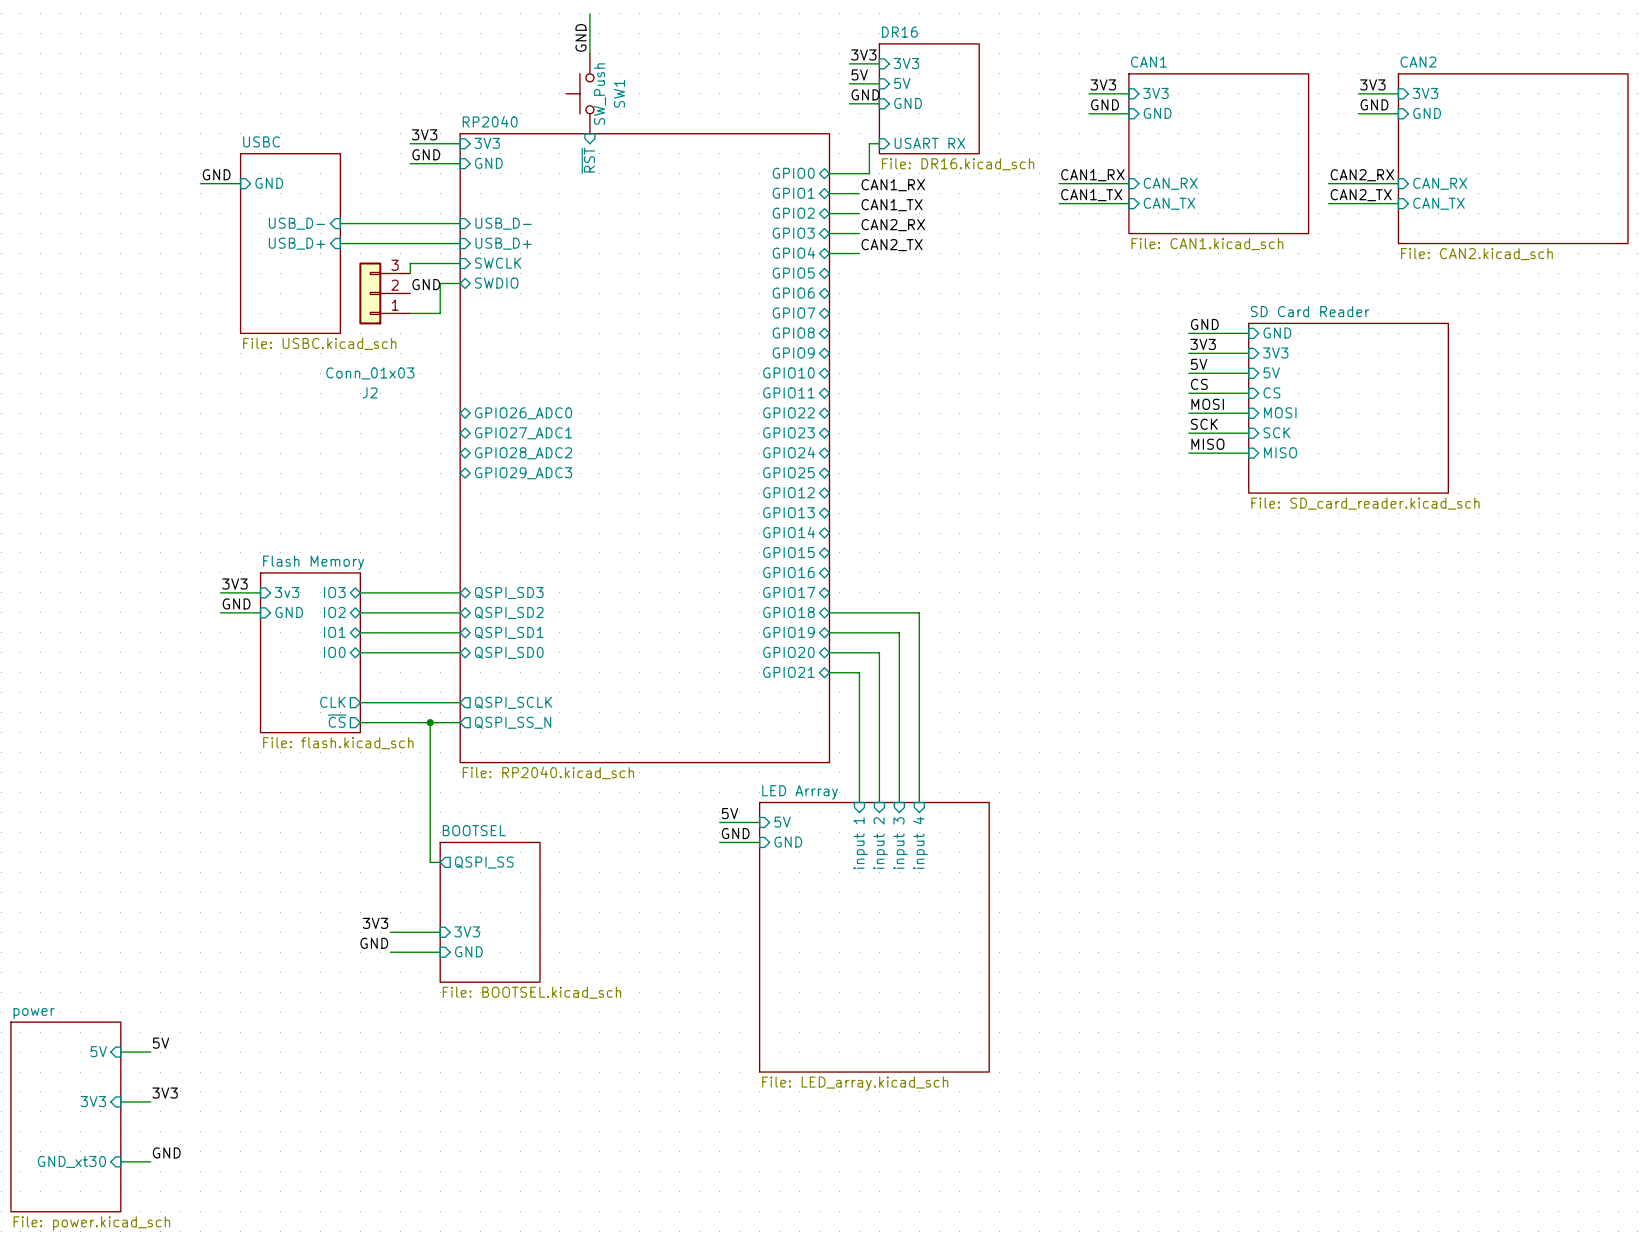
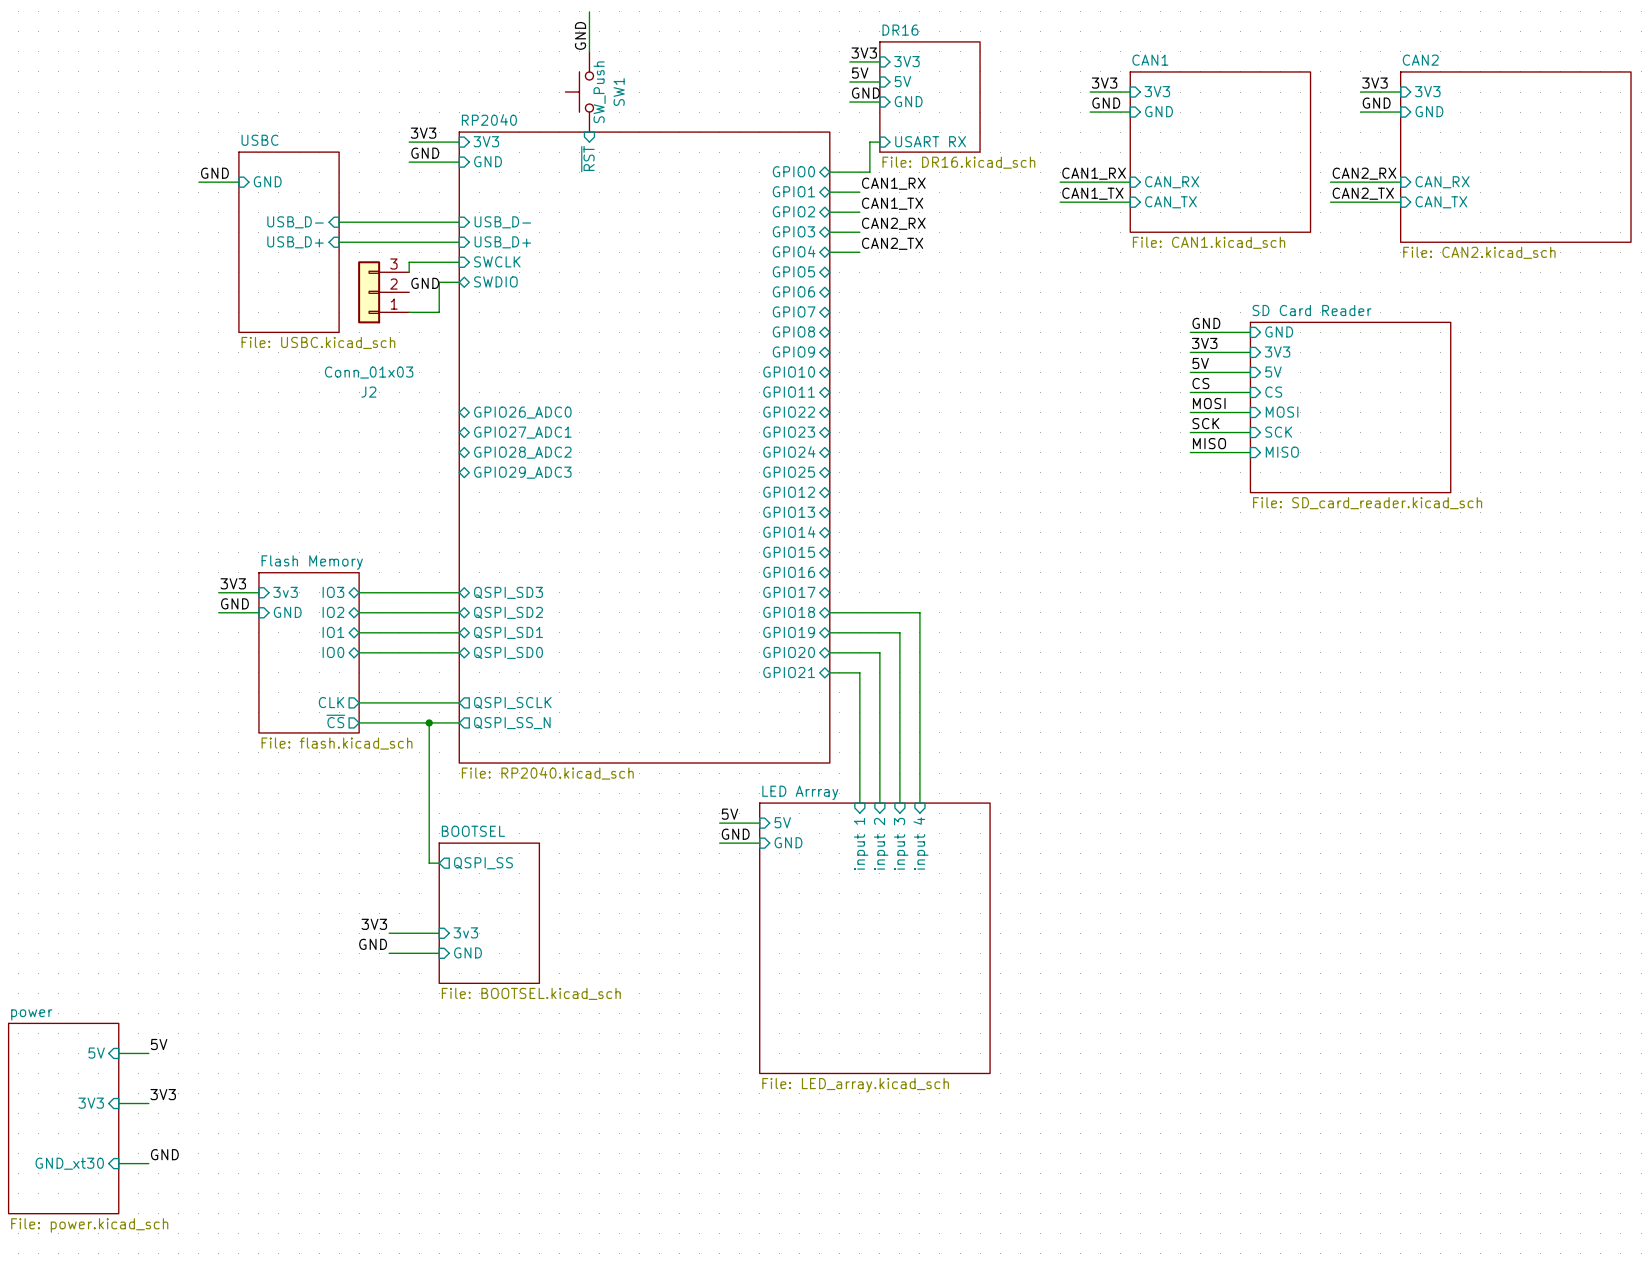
sheet pin: 3V3 (467, 931) -> 3v3 (465, 932)

